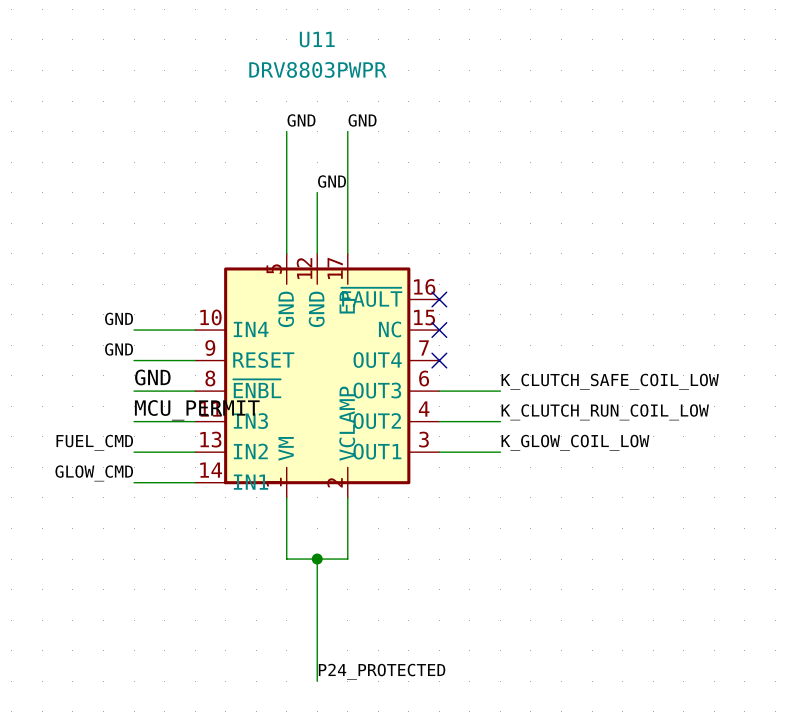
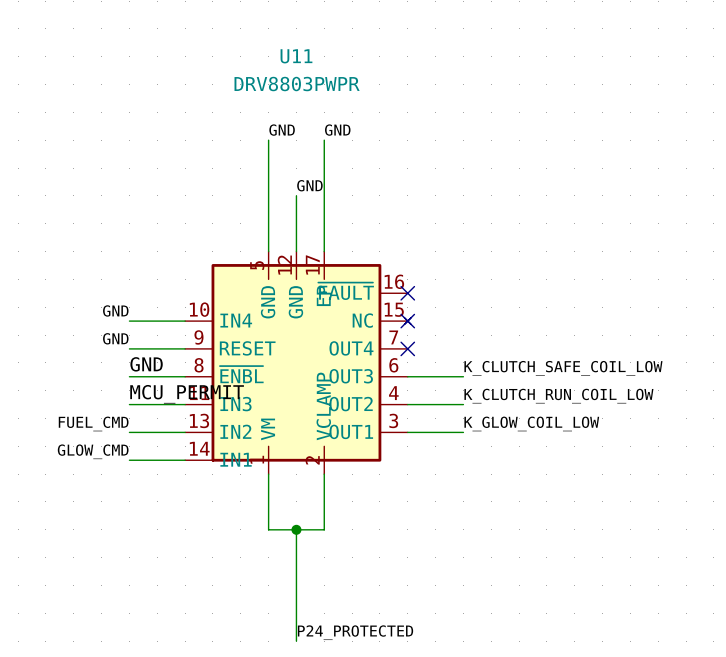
U11 symbol: [195, 253, 440, 498] -> [185, 251, 412, 475]

